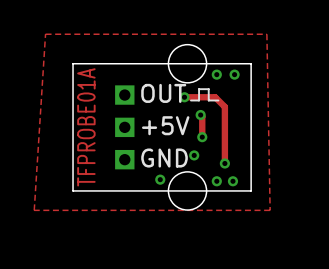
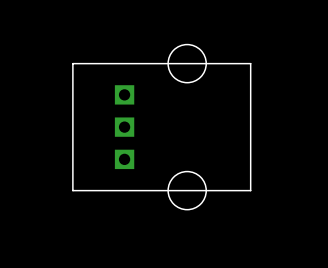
zone outline: (45, 34) (34, 210) (270, 210) (266, 34) (45, 34) -> none
via: (216, 74) -> none
via: (234, 74) -> none
text: OUT (163, 93) -> none
track: (184, 97) (215, 97) (224, 106) (224, 163) -> none
via: (184, 97) -> none
line: (190, 100) (199, 100) (199, 89) (208, 89) (208, 100) (218, 100) -> none
track: (200, 115) (202, 137) -> none
via: (200, 115) -> none
text: +5V (165, 125) -> none
text: TFPROBE01A (86, 127) -> none
via: (202, 137) -> none
via: (194, 155) -> none
text: GND (164, 158) -> none
via: (224, 163) -> none
via: (160, 179) -> none
via: (216, 181) -> none
via: (232, 181) -> none

